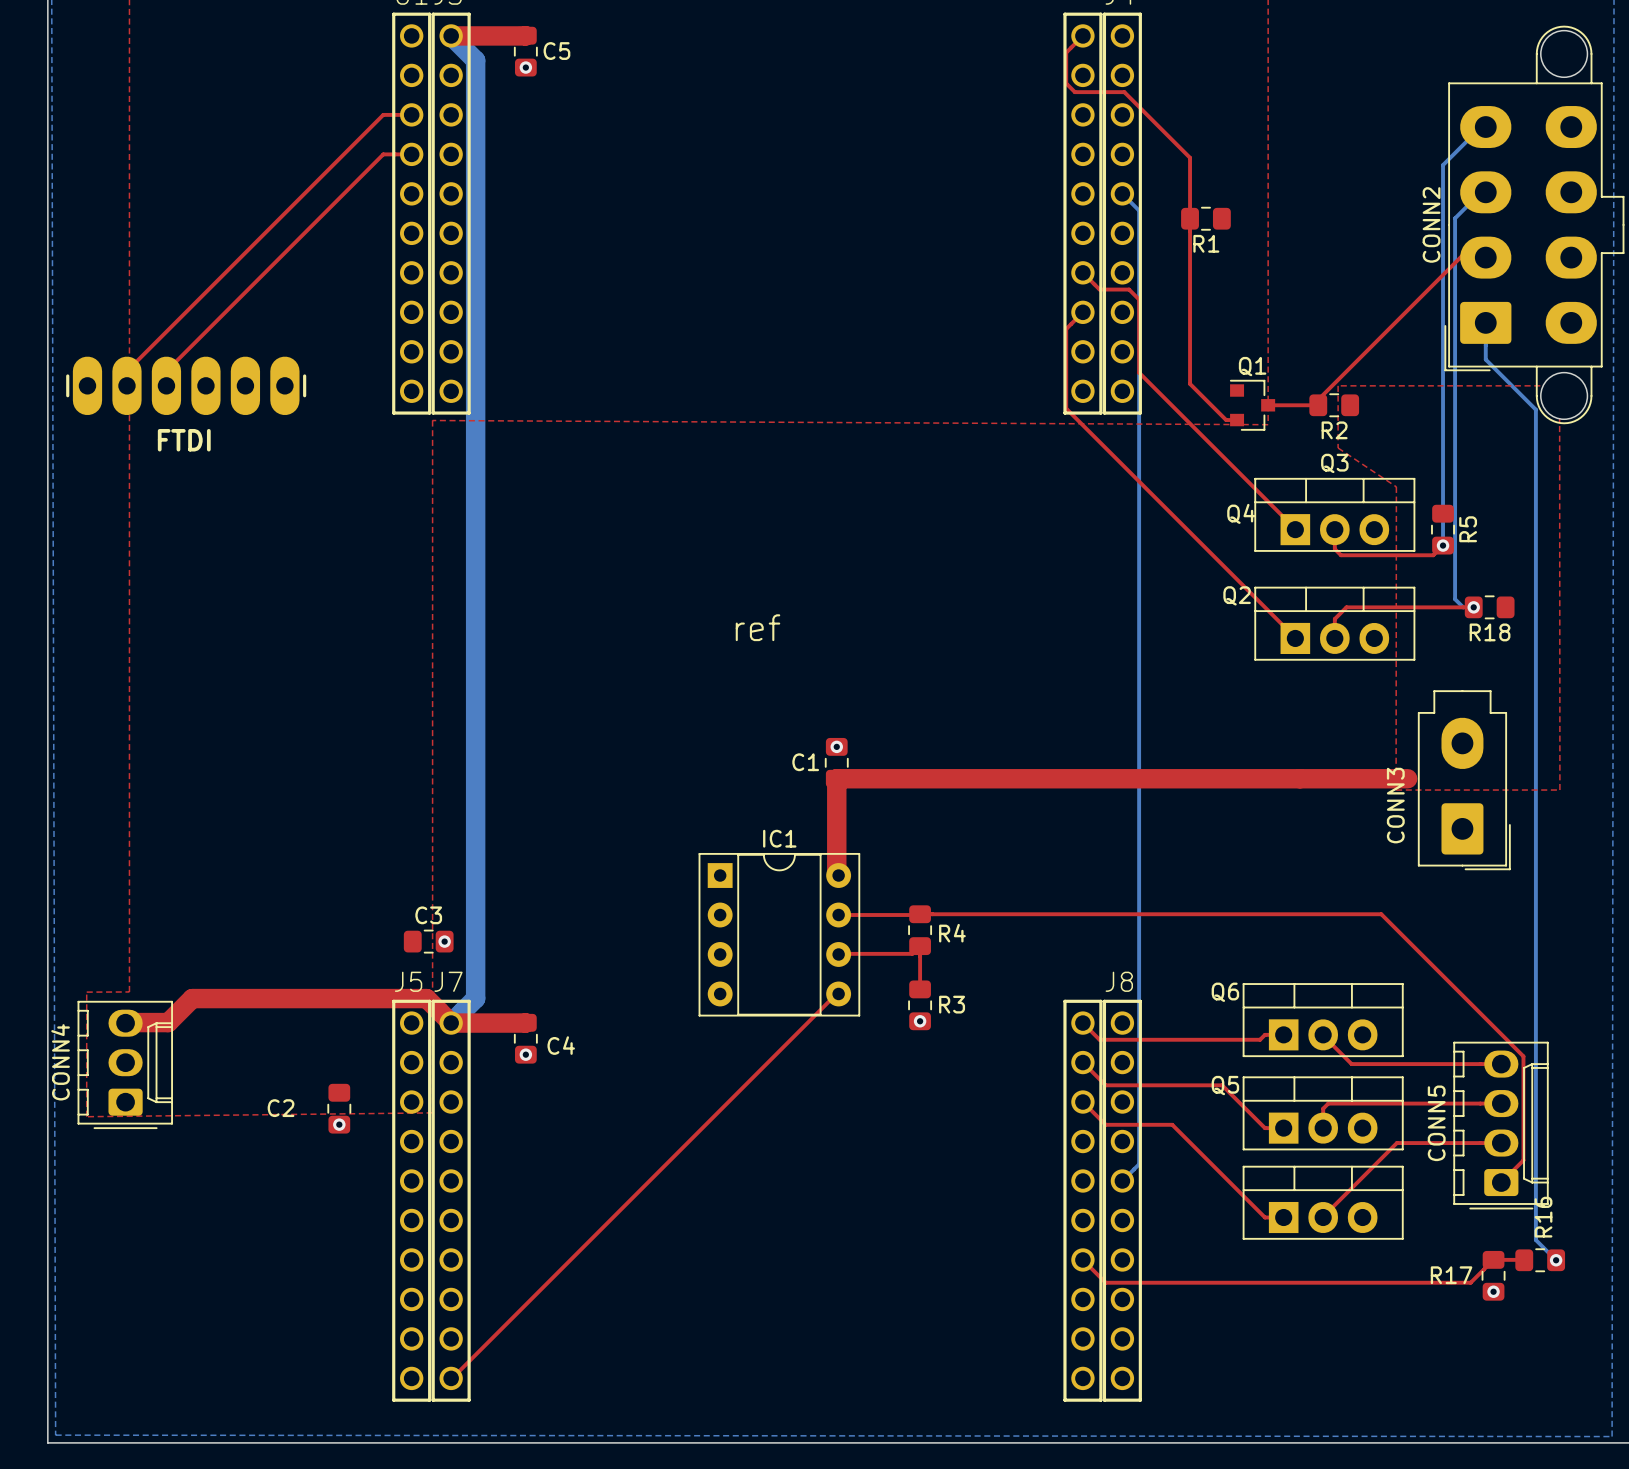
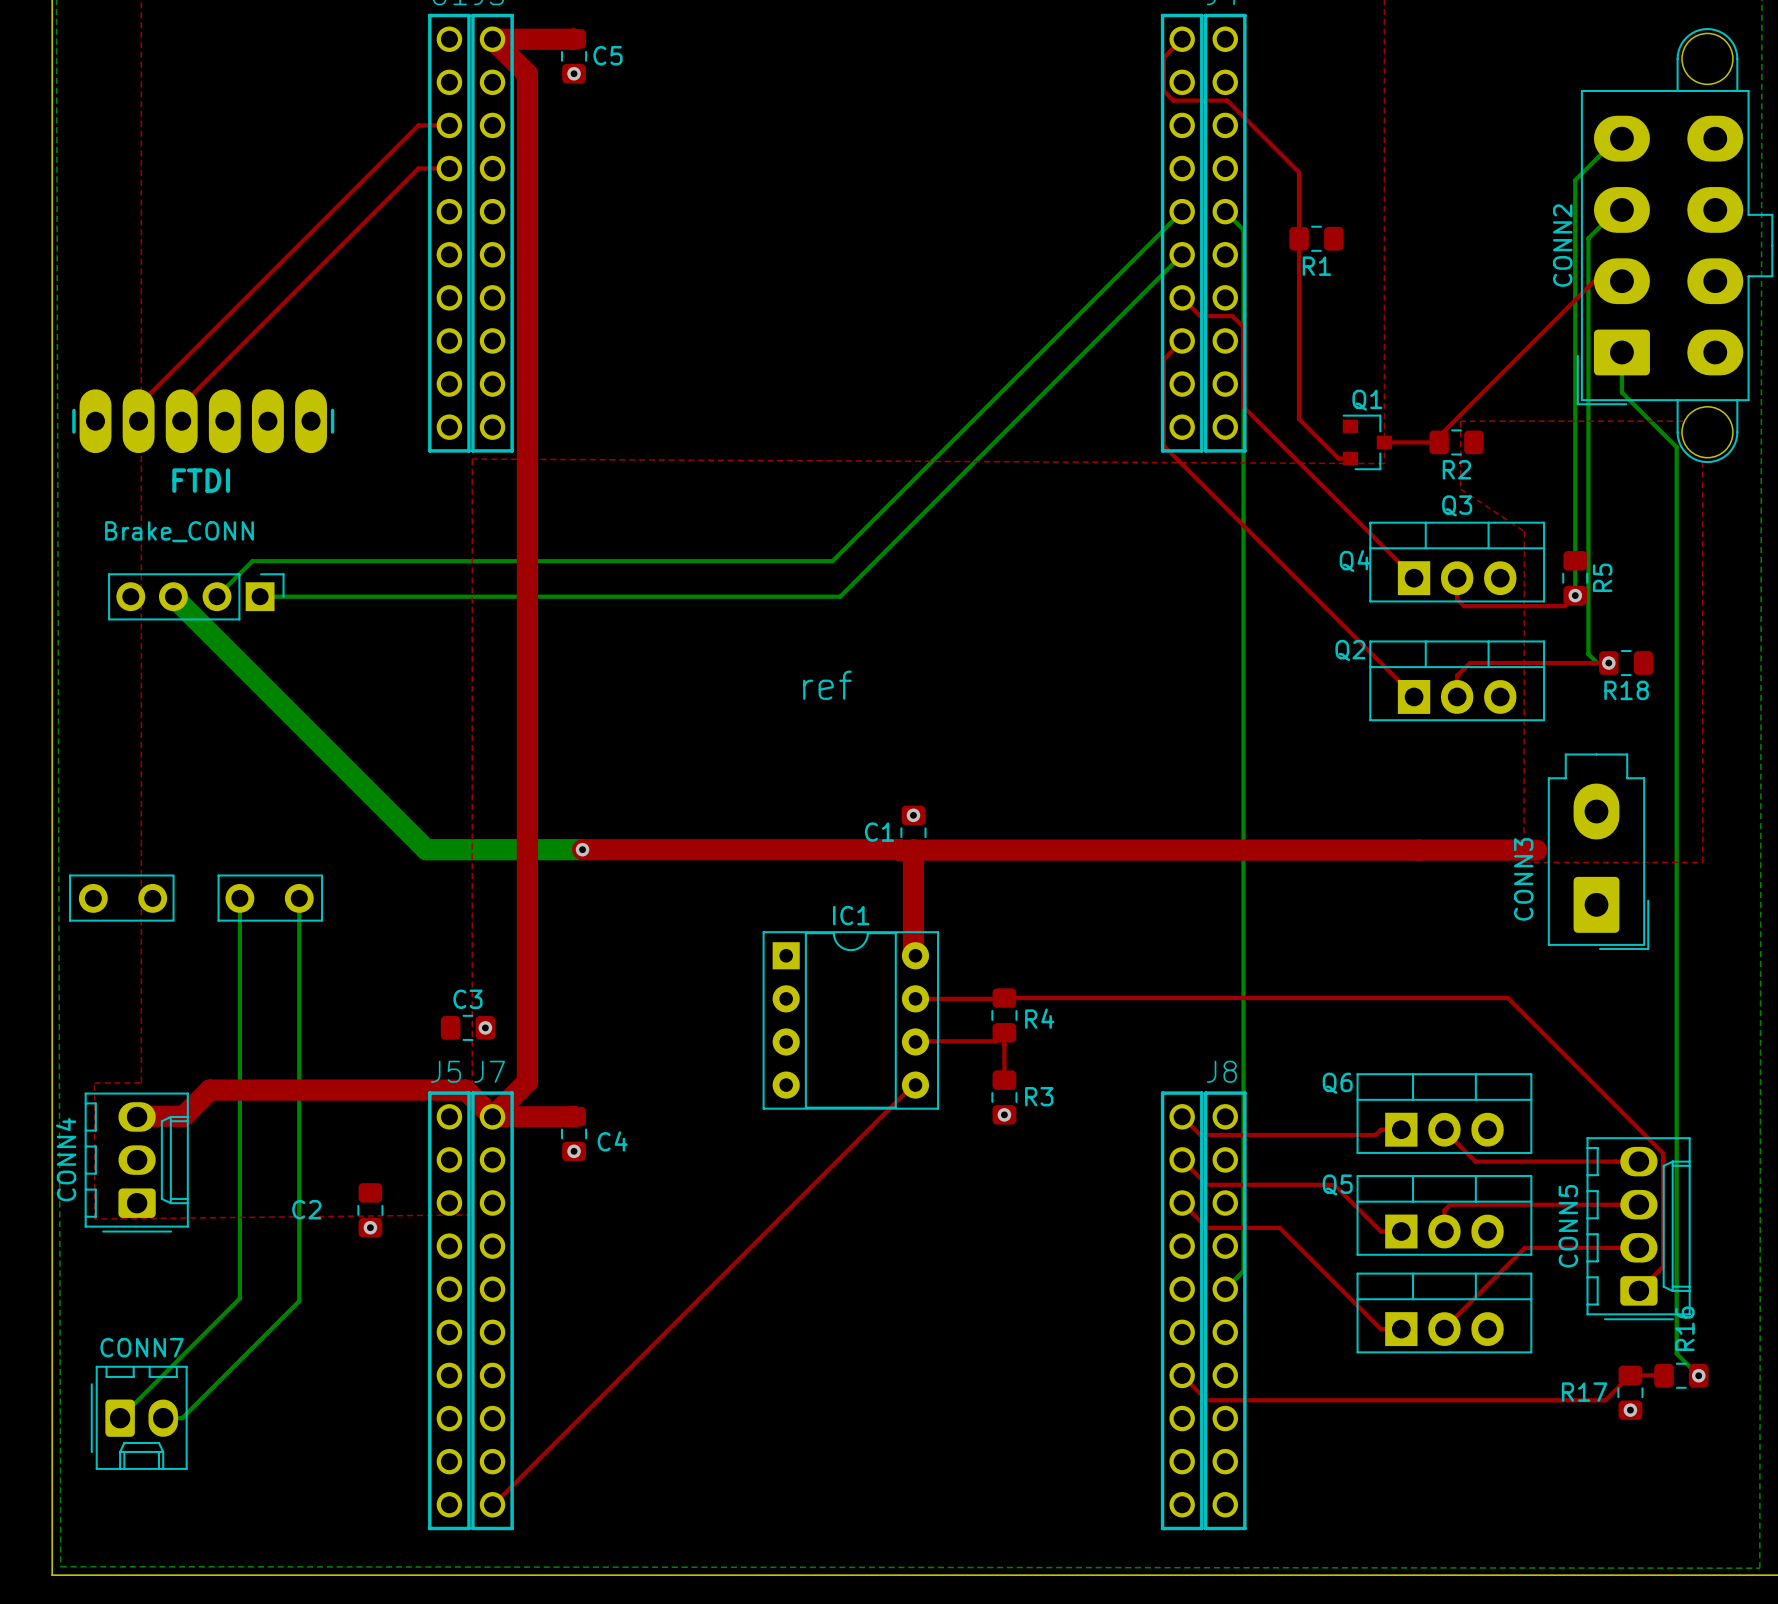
top track: none -> (492, 39) (527, 74) (527, 1081) (492, 1116)
bottom track: (451, 35) (475, 60) (475, 998) (451, 1023) -> none
bottom track: none -> (1182, 211) (832, 561) (252, 561) (217, 596)
bottom track: none -> (1182, 254) (840, 596) (260, 596)
bottom track: none -> (173, 596) (426, 849) (582, 849)
part: none -> Brake_CONN (196, 747)
top track: none -> (582, 849) (913, 850)
via: none -> (582, 849)
bottom track: none -> (239, 898) (239, 1298) (120, 1418)
bottom track: none -> (299, 898) (299, 1301) (182, 1418) (163, 1418)
CONN7: none -> (139, 1417)

